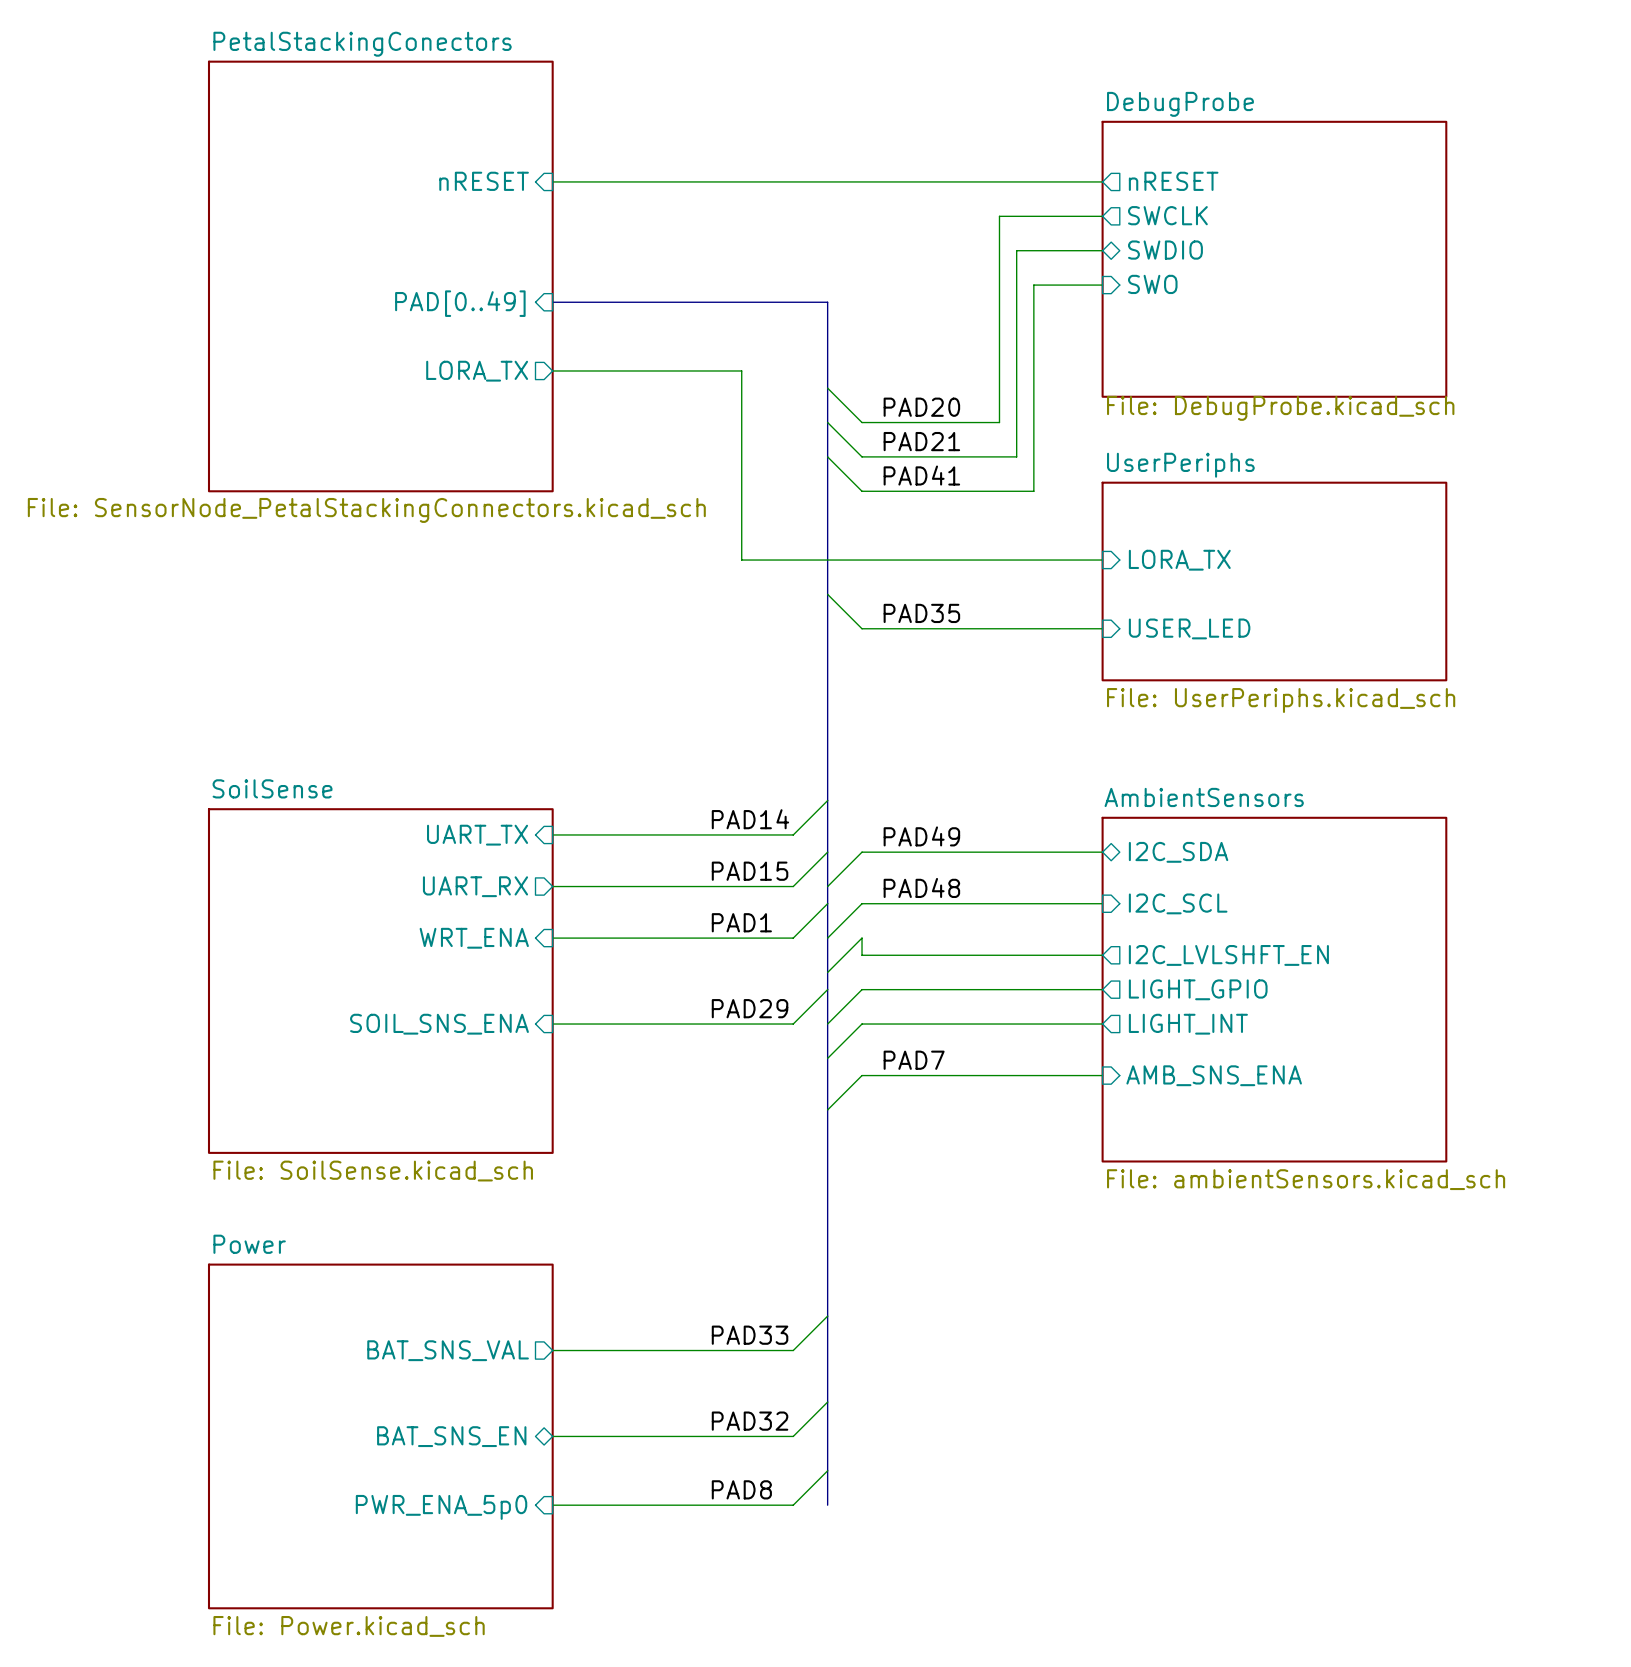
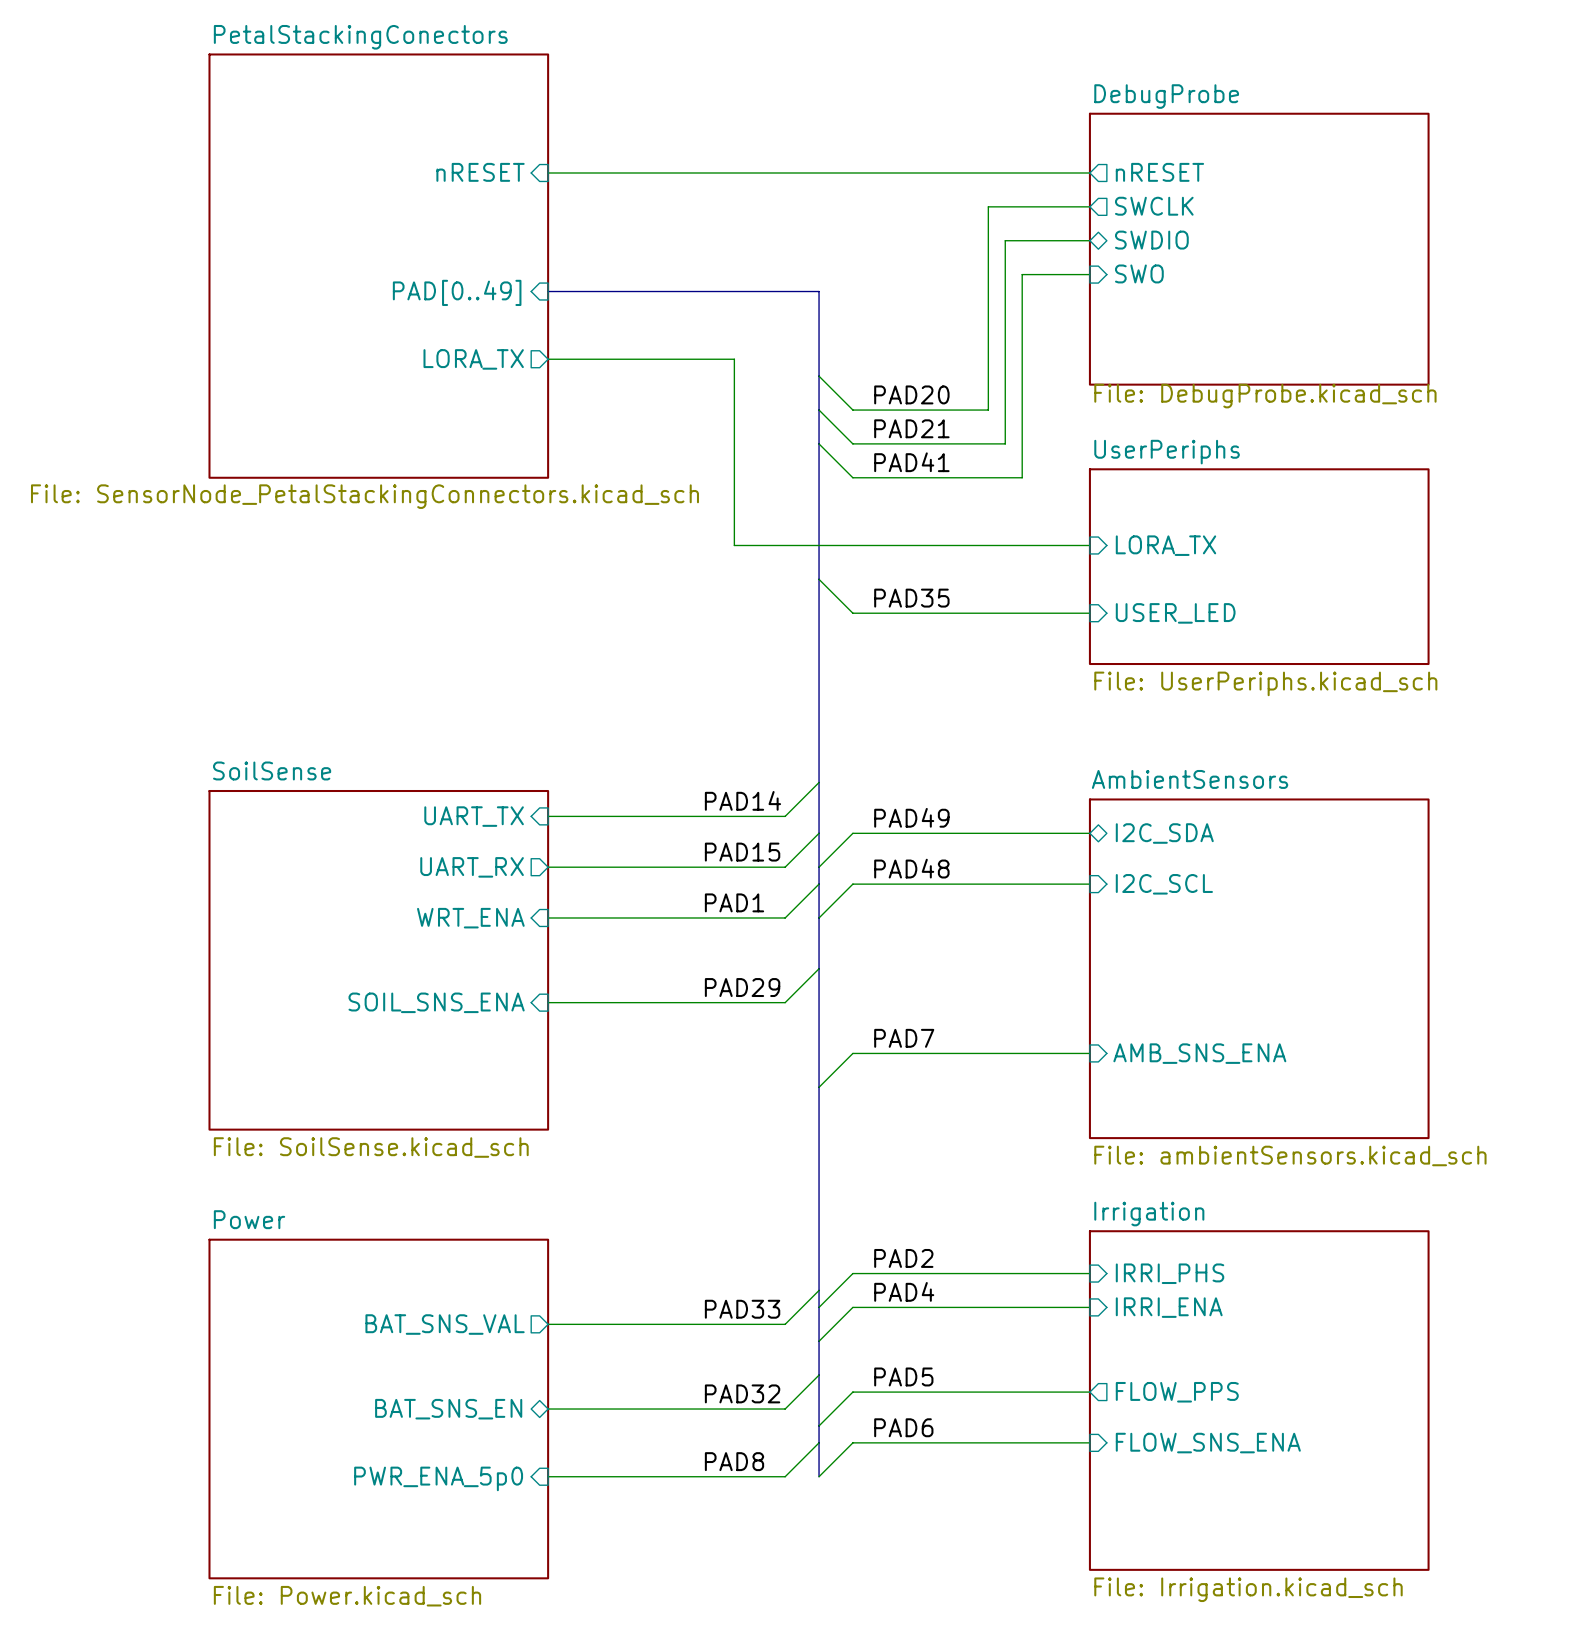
wire: (1102, 955) (862, 955) (862, 938) (827, 972) -> none
sheet pin: I2C_LVLSHFT_EN (1228, 955) -> none
wire: (1102, 989) (862, 989) (827, 1024) -> (1089, 1273) (852, 1273) (819, 1307)
sheet pin: LIGHT_GPIO (1198, 989) -> none
wire: (1102, 1024) (862, 1024) (827, 1058) -> (1089, 1307) (852, 1307) (819, 1341)
sheet pin: LIGHT_INT (1188, 1024) -> none
label: none -> PAD2 (903, 1258)
sheet pin: none -> IRRI_PHS (1170, 1273)
label: none -> PAD4 (904, 1291)
sheet pin: none -> IRRI_ENA (1169, 1307)
label: none -> PAD5 (903, 1376)
wire: none -> (1089, 1392) (852, 1392) (819, 1425)
sheet pin: none -> FLOW_PPS (1177, 1392)
sheet Irrigation: none -> File: Irrigation.kicad_sch (1259, 1400)
label: none -> PAD6 (903, 1427)
wire: none -> (1089, 1442) (852, 1442) (819, 1476)
sheet pin: none -> FLOW_SNS_ENA (1208, 1443)

